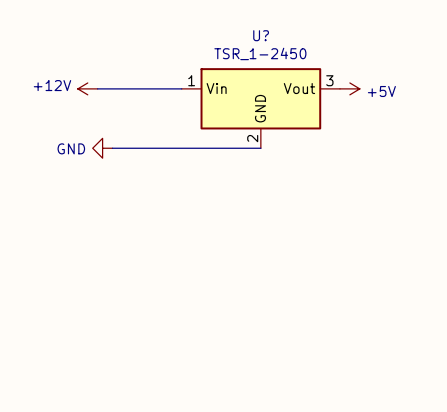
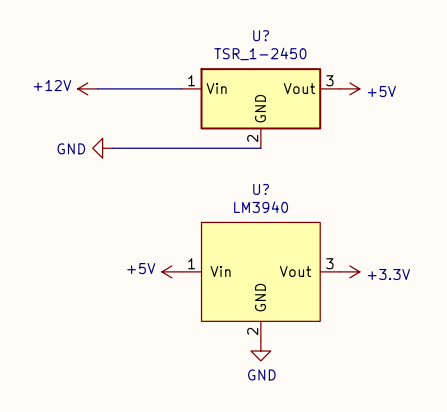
power symbol: none -> +5V (171, 271)
power symbol: none -> +3.3V (349, 271)
U?: none -> LM3940 (260, 281)
power symbol: none -> GND (260, 351)

